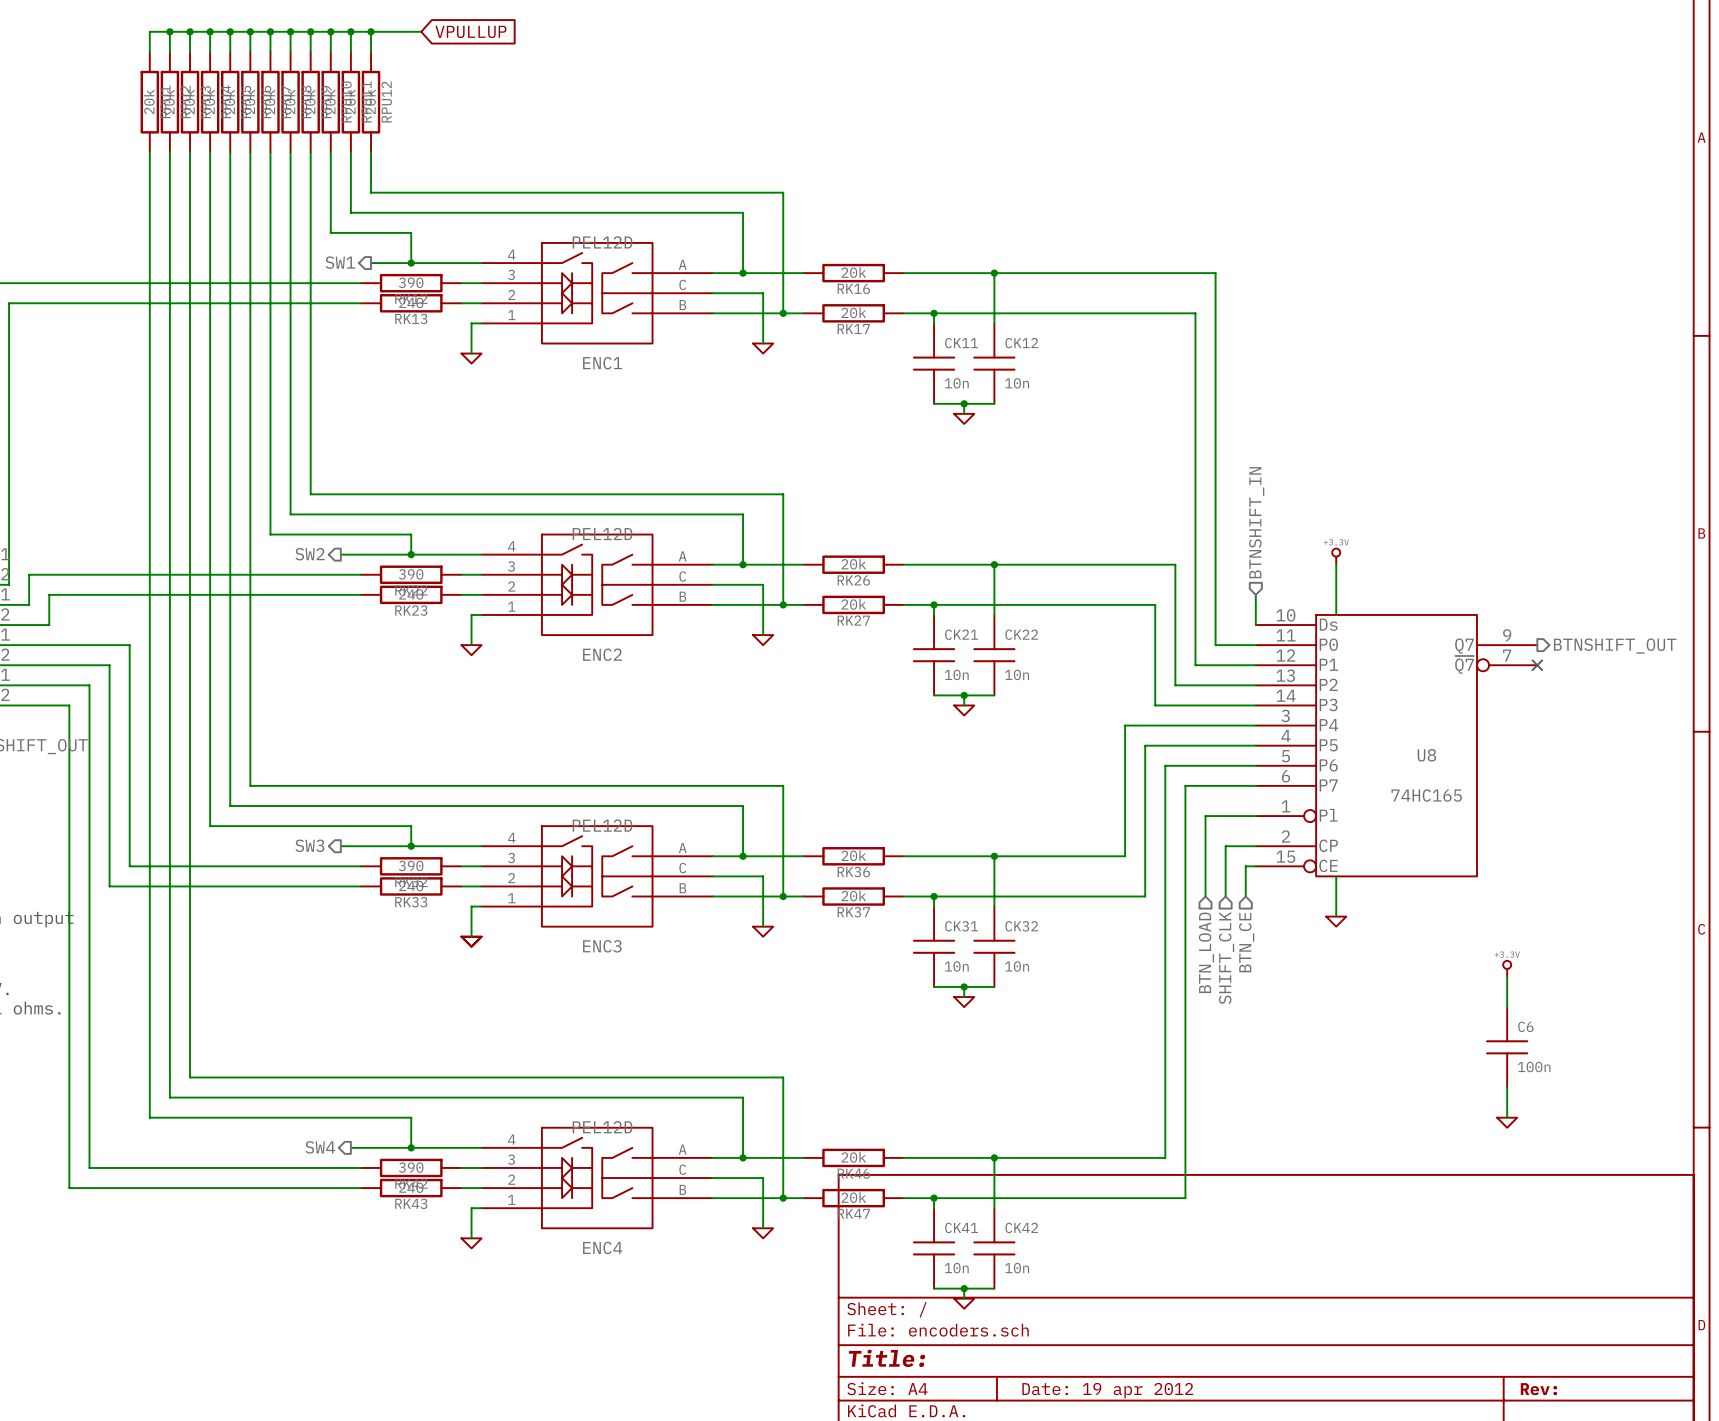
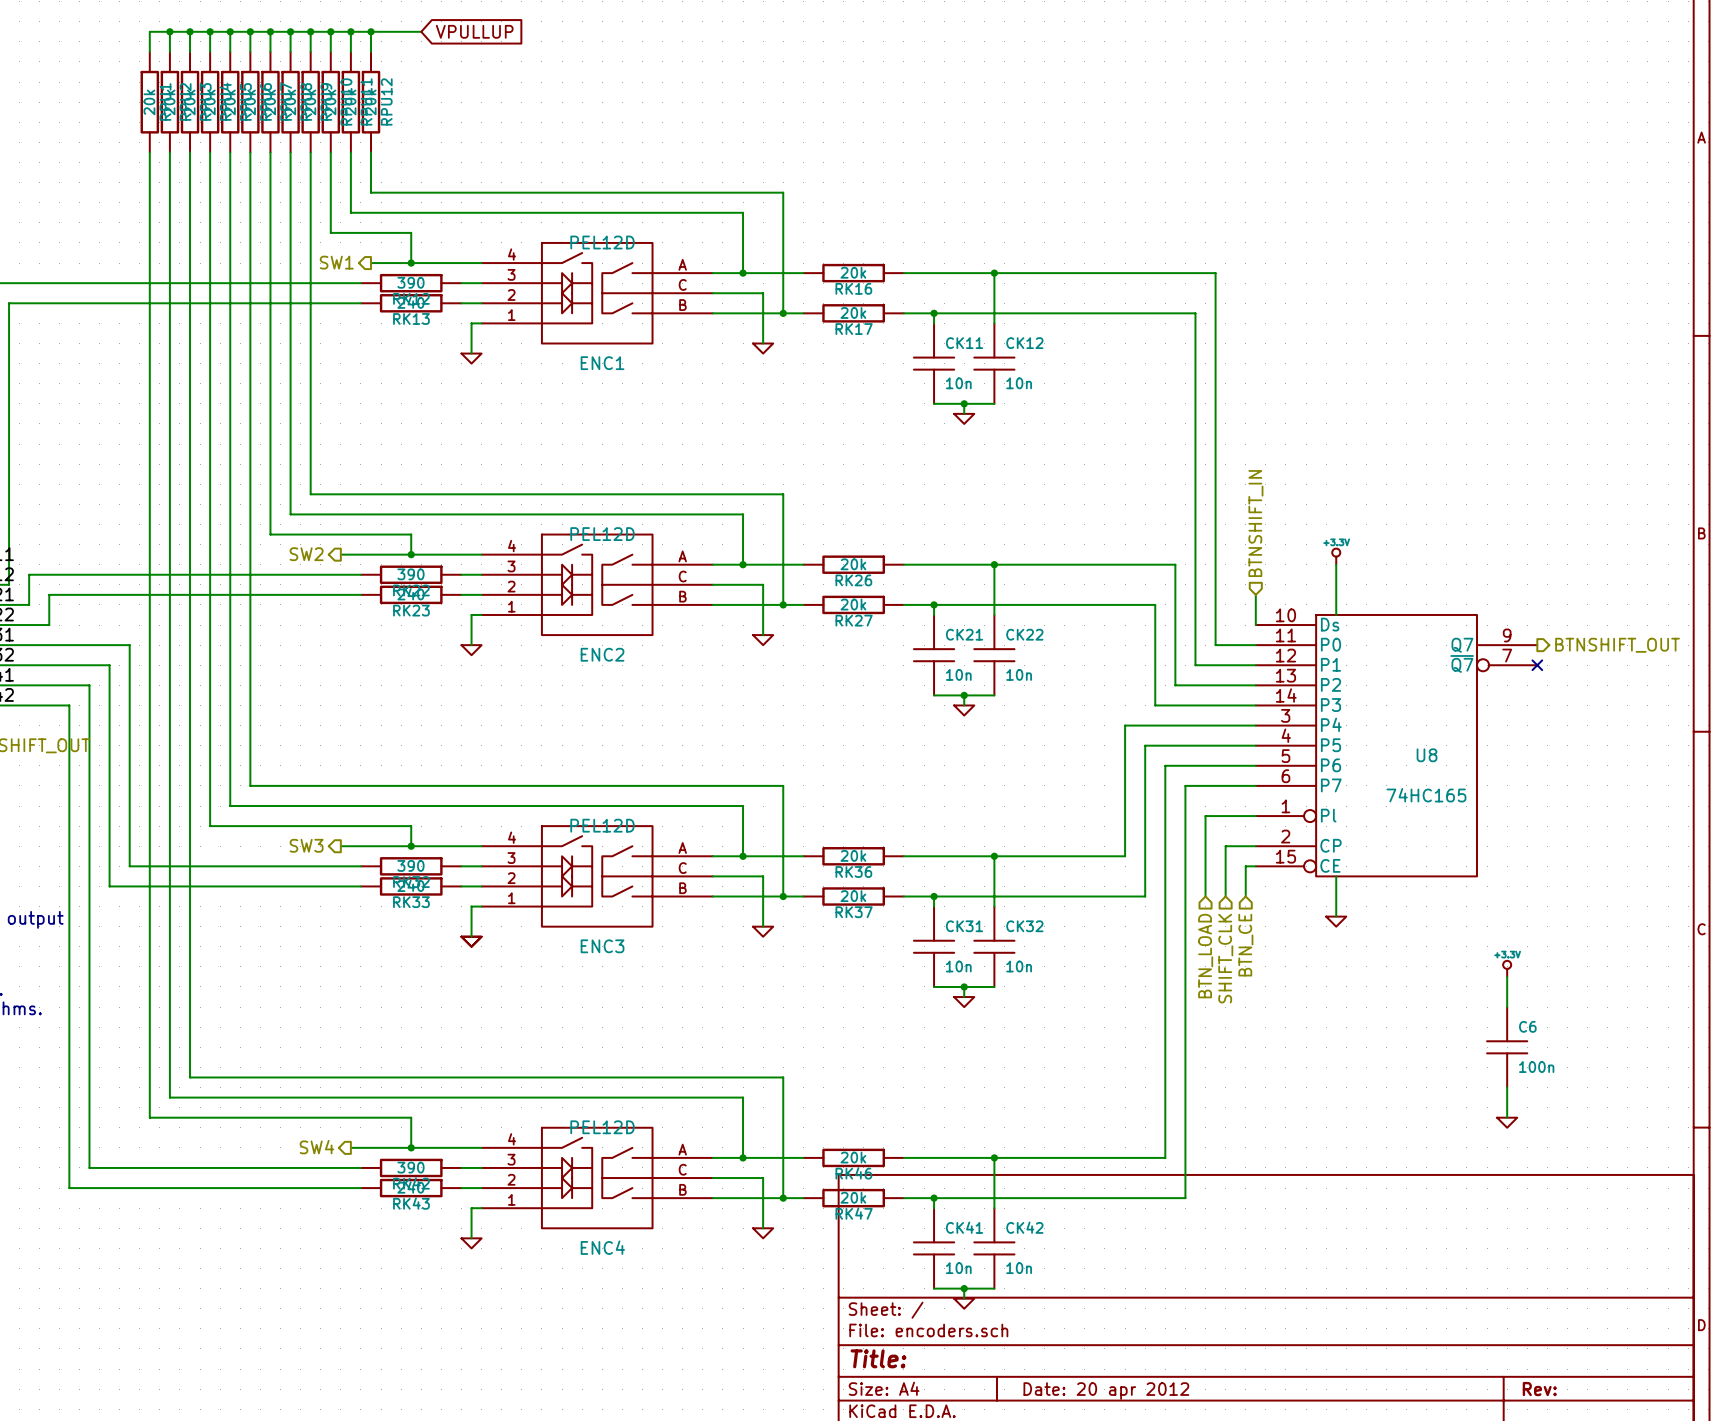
title block: Date: 19 apr 2012 (1107, 1390) -> Date: 20 apr 2012 (1106, 1391)

